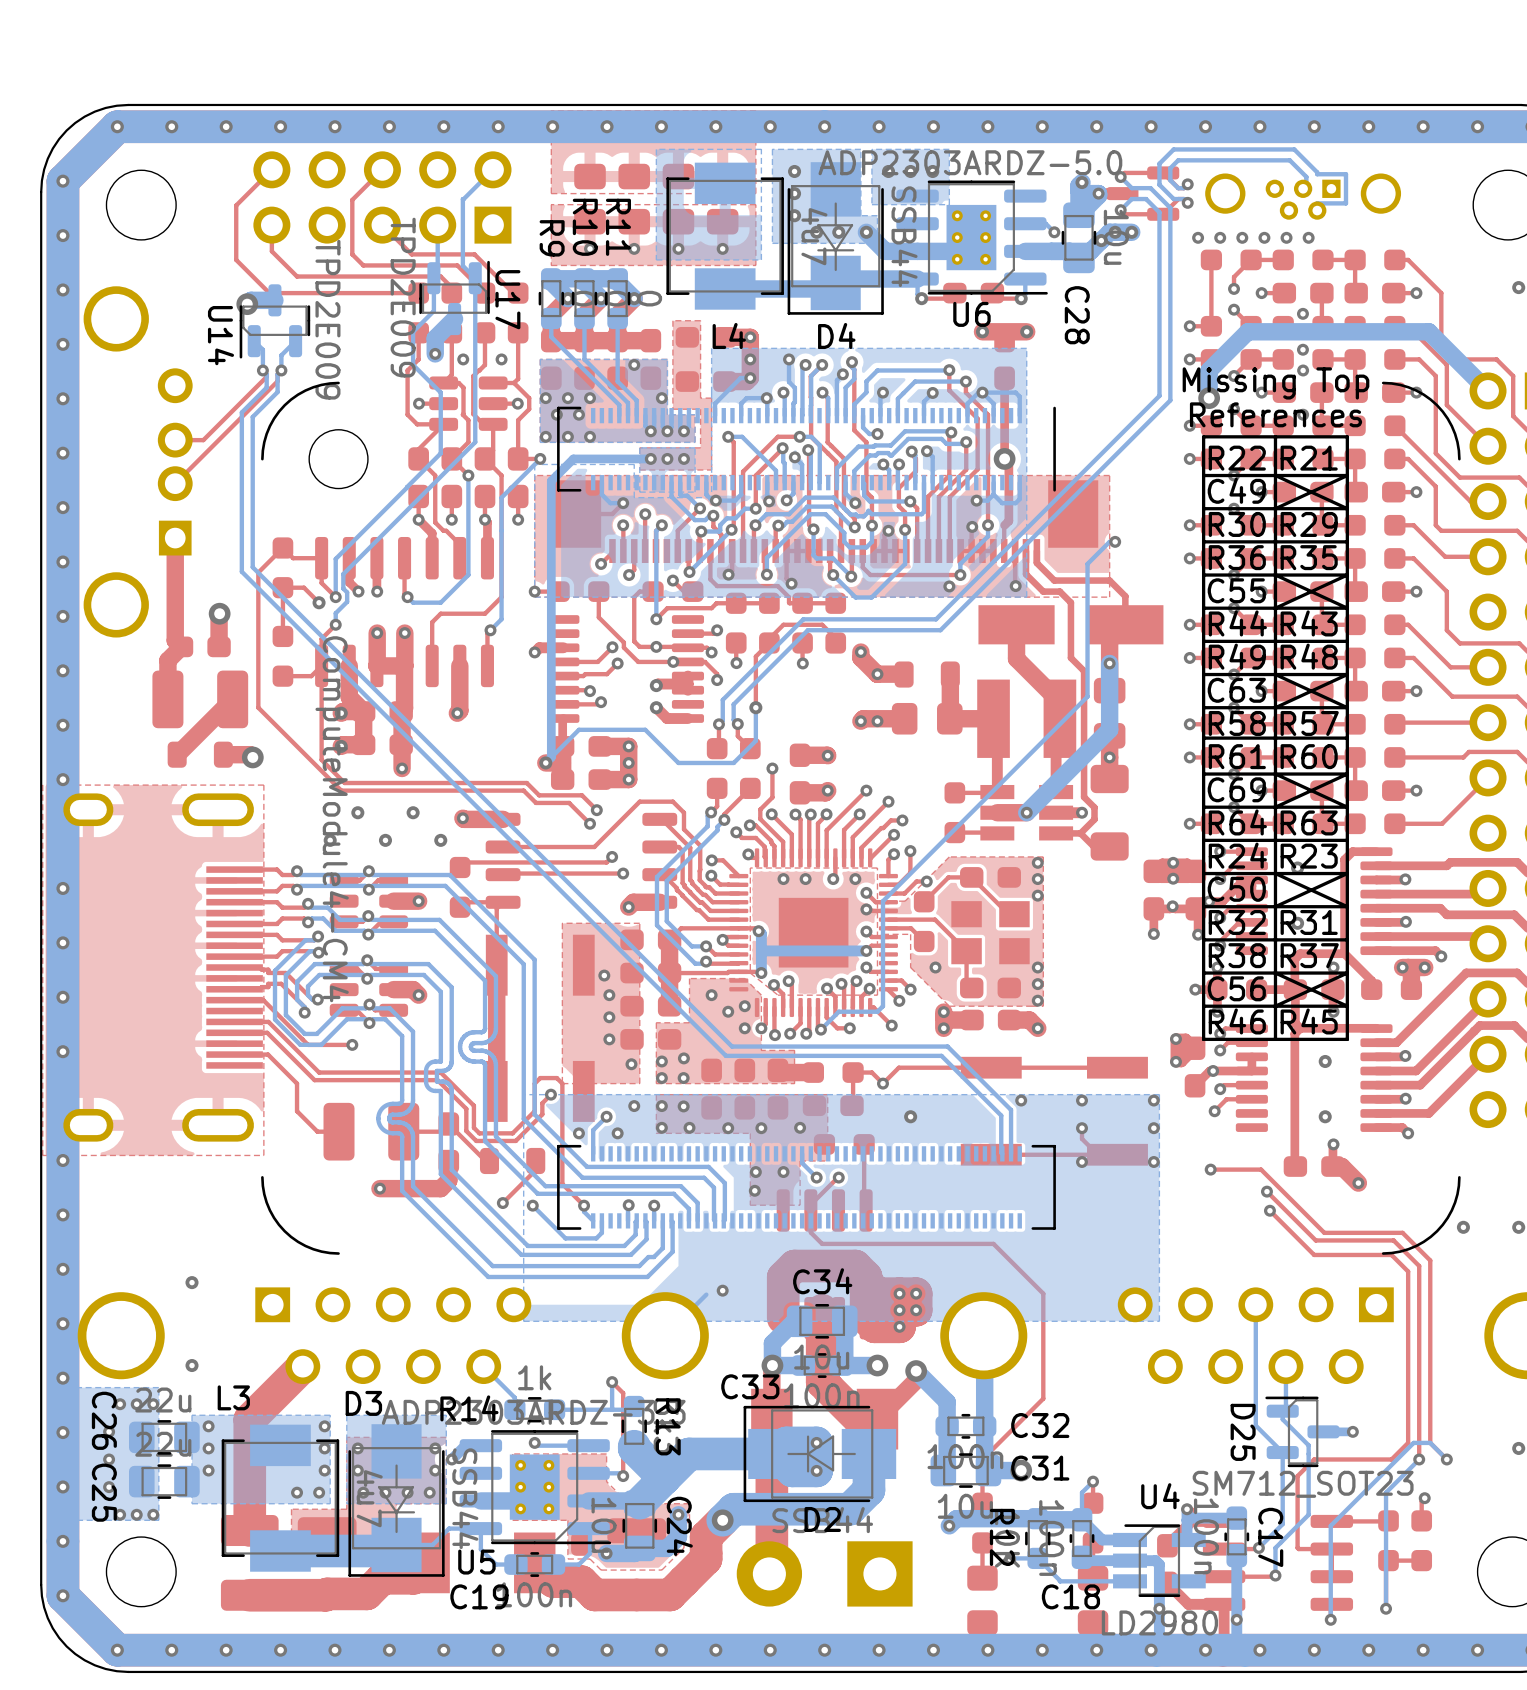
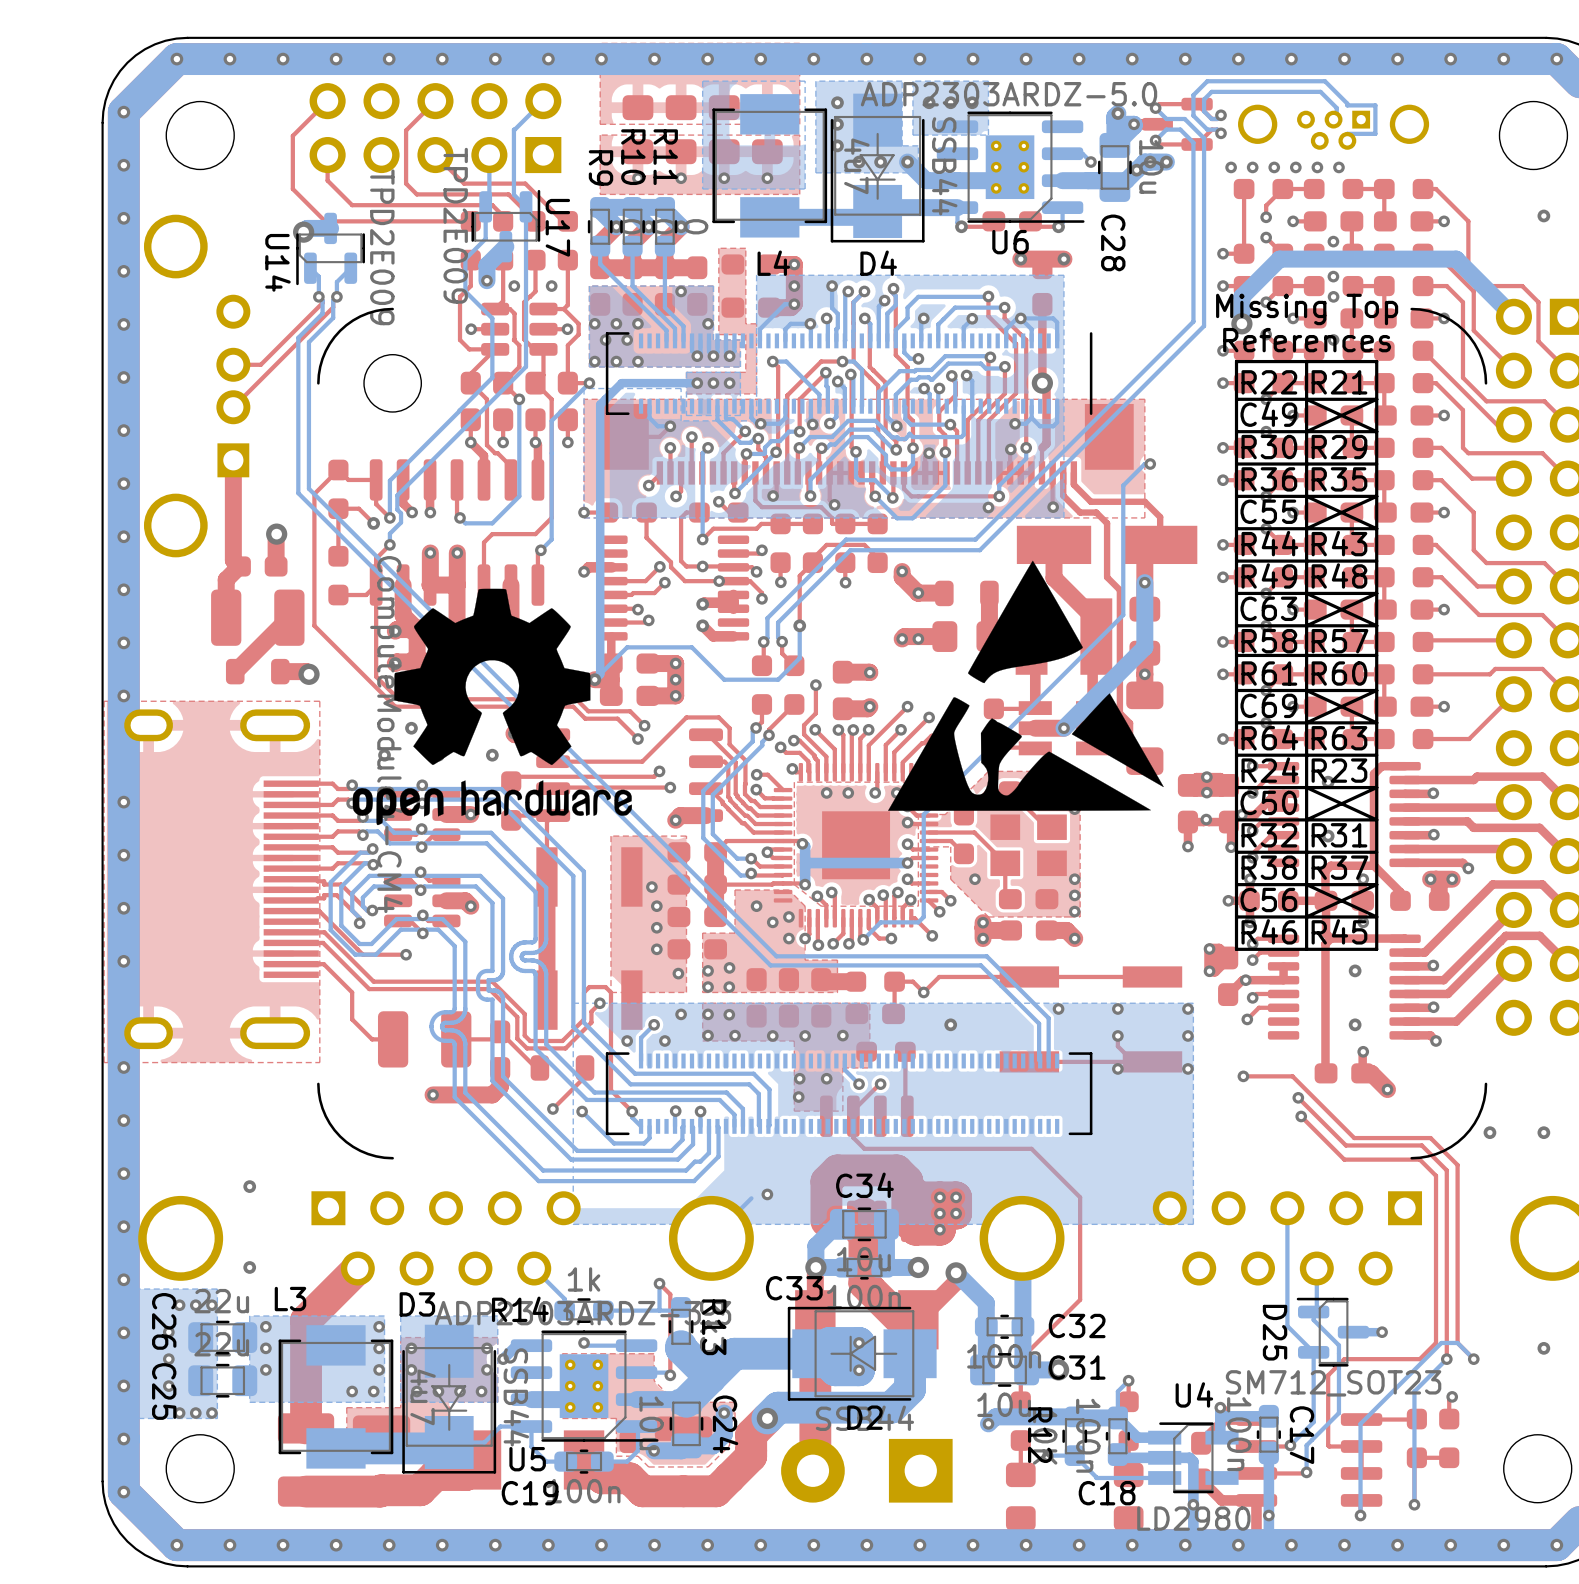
drawing: none -> [888, 560, 1164, 811]
drawing: none -> [352, 588, 632, 826]

